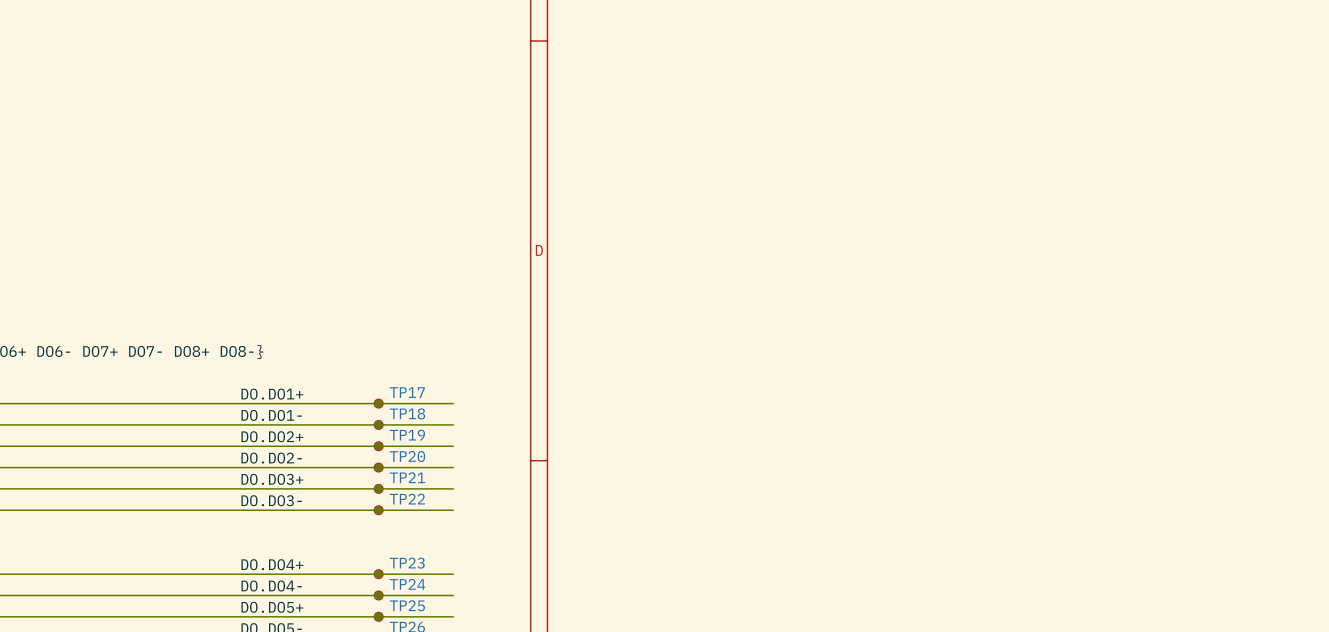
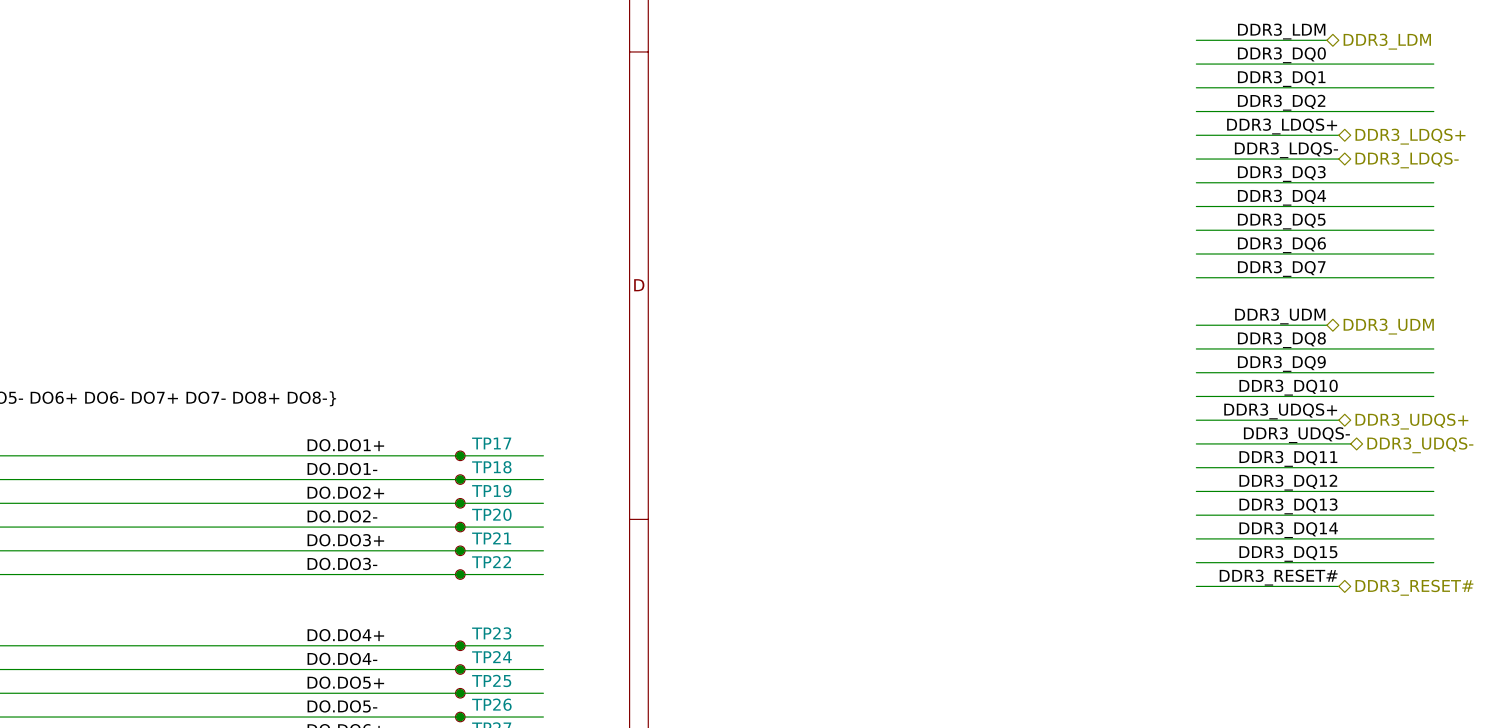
label: none -> DDR3_LDM (1281, 31)
wire: none -> (1196, 40) (1326, 40)
hierarchical label: none -> DDR3_LDM (1387, 41)
label: none -> DDR3_DQ0 (1281, 55)
wire: none -> (1196, 64) (1433, 64)
label: none -> DDR3_DQ1 (1281, 79)
wire: none -> (1196, 87) (1433, 87)
label: none -> DDR3_DQ2 (1281, 102)
wire: none -> (1196, 111) (1433, 111)
label: none -> DDR3_LDQS+ (1282, 126)
wire: none -> (1196, 135) (1338, 135)
hierarchical label: none -> DDR3_LDQS+ (1410, 136)
label: none -> DDR3_LDQS- (1286, 150)
wire: none -> (1196, 159) (1338, 159)
hierarchical label: none -> DDR3_LDQS- (1407, 160)
label: none -> DDR3_DQ3 (1281, 173)
wire: none -> (1196, 182) (1433, 182)
label: none -> DDR3_DQ4 (1281, 197)
wire: none -> (1196, 206) (1433, 206)
label: none -> DDR3_DQ5 (1281, 221)
wire: none -> (1196, 230) (1433, 230)
label: none -> DDR3_DQ6 (1281, 245)
wire: none -> (1196, 253) (1433, 253)
label: none -> DDR3_DQ7 (1281, 268)
wire: none -> (1196, 277) (1433, 277)
label: none -> DDR3_UDM (1280, 316)
wire: none -> (1196, 325) (1326, 325)
hierarchical label: none -> DDR3_UDM (1388, 326)
label: none -> DDR3_DQ8 (1281, 340)
wire: none -> (1196, 348) (1433, 348)
label: none -> DDR3_DQ9 (1281, 363)
wire: none -> (1196, 372) (1433, 372)
label: none -> DDR3_DQ10 (1288, 387)
wire: none -> (1196, 396) (1433, 396)
label: none -> DDR3_UDQS+ (1280, 411)
wire: none -> (1196, 420) (1338, 420)
hierarchical label: none -> DDR3_UDQS+ (1411, 421)
label: none -> DDR3_UDQS- (1296, 435)
wire: none -> (1196, 443) (1350, 443)
hierarchical label: none -> DDR3_UDQS- (1420, 445)
label: none -> DDR3_DQ11 (1288, 458)
wire: none -> (1196, 467) (1433, 467)
label: none -> DDR3_DQ12 (1288, 482)
wire: none -> (1196, 491) (1433, 491)
label: none -> DDR3_DQ13 (1288, 506)
wire: none -> (1196, 515) (1433, 515)
label: none -> DDR3_DQ14 (1288, 530)
wire: none -> (1196, 538) (1433, 538)
label: none -> DDR3_DQ15 (1288, 553)
wire: none -> (1196, 562) (1433, 562)
label: none -> DDR3_RESET# (1278, 577)
wire: none -> (1196, 586) (1338, 586)
hierarchical label: none -> DDR3_RESET# (1414, 587)

